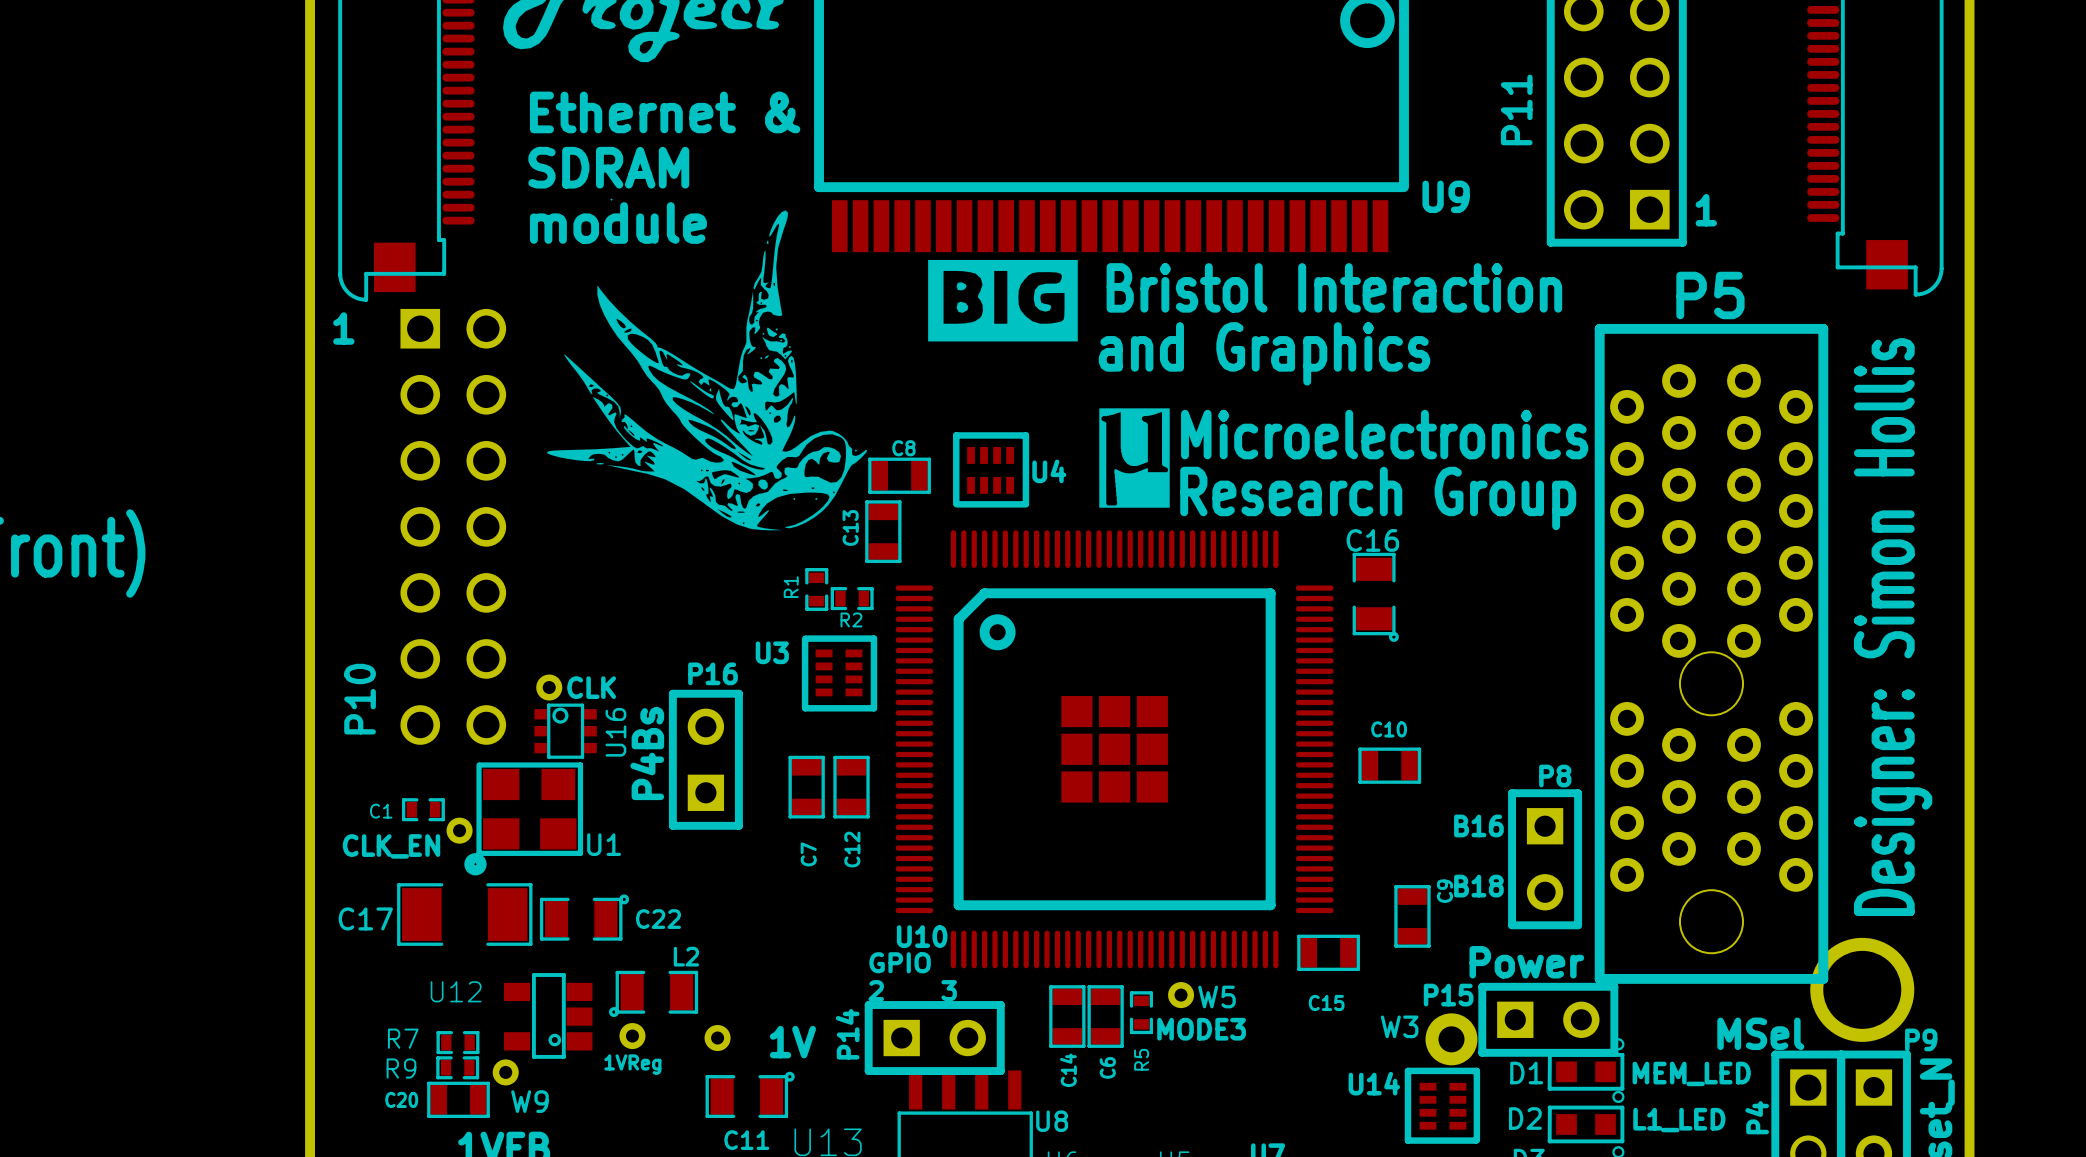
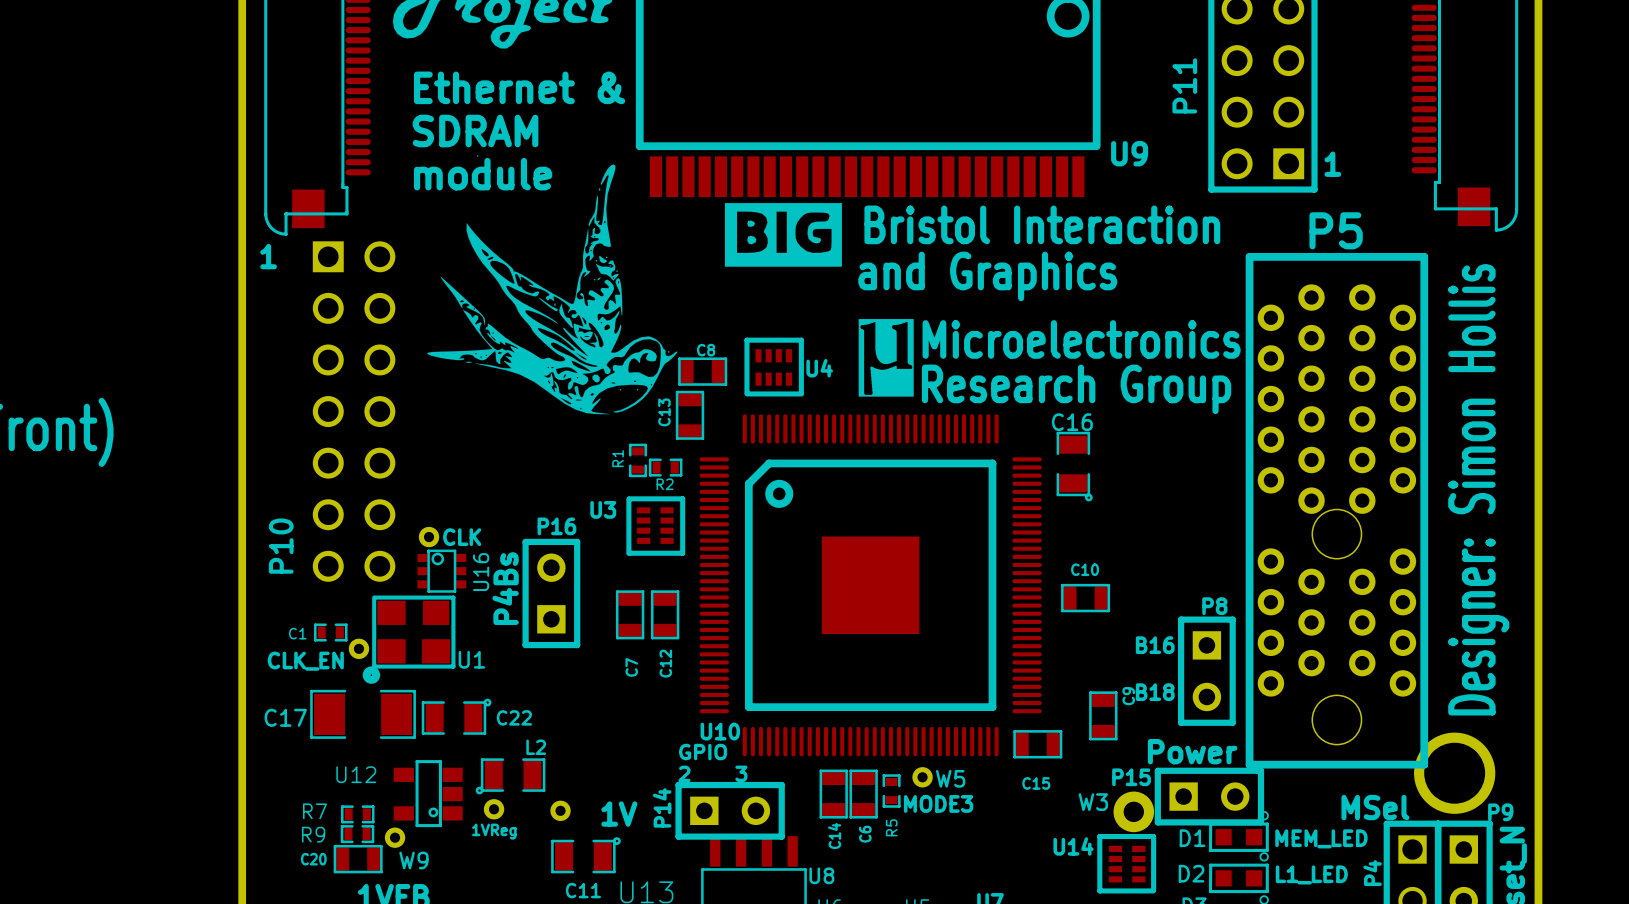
U10 footprint: [895, 530, 1334, 969] -> [699, 414, 1042, 757]

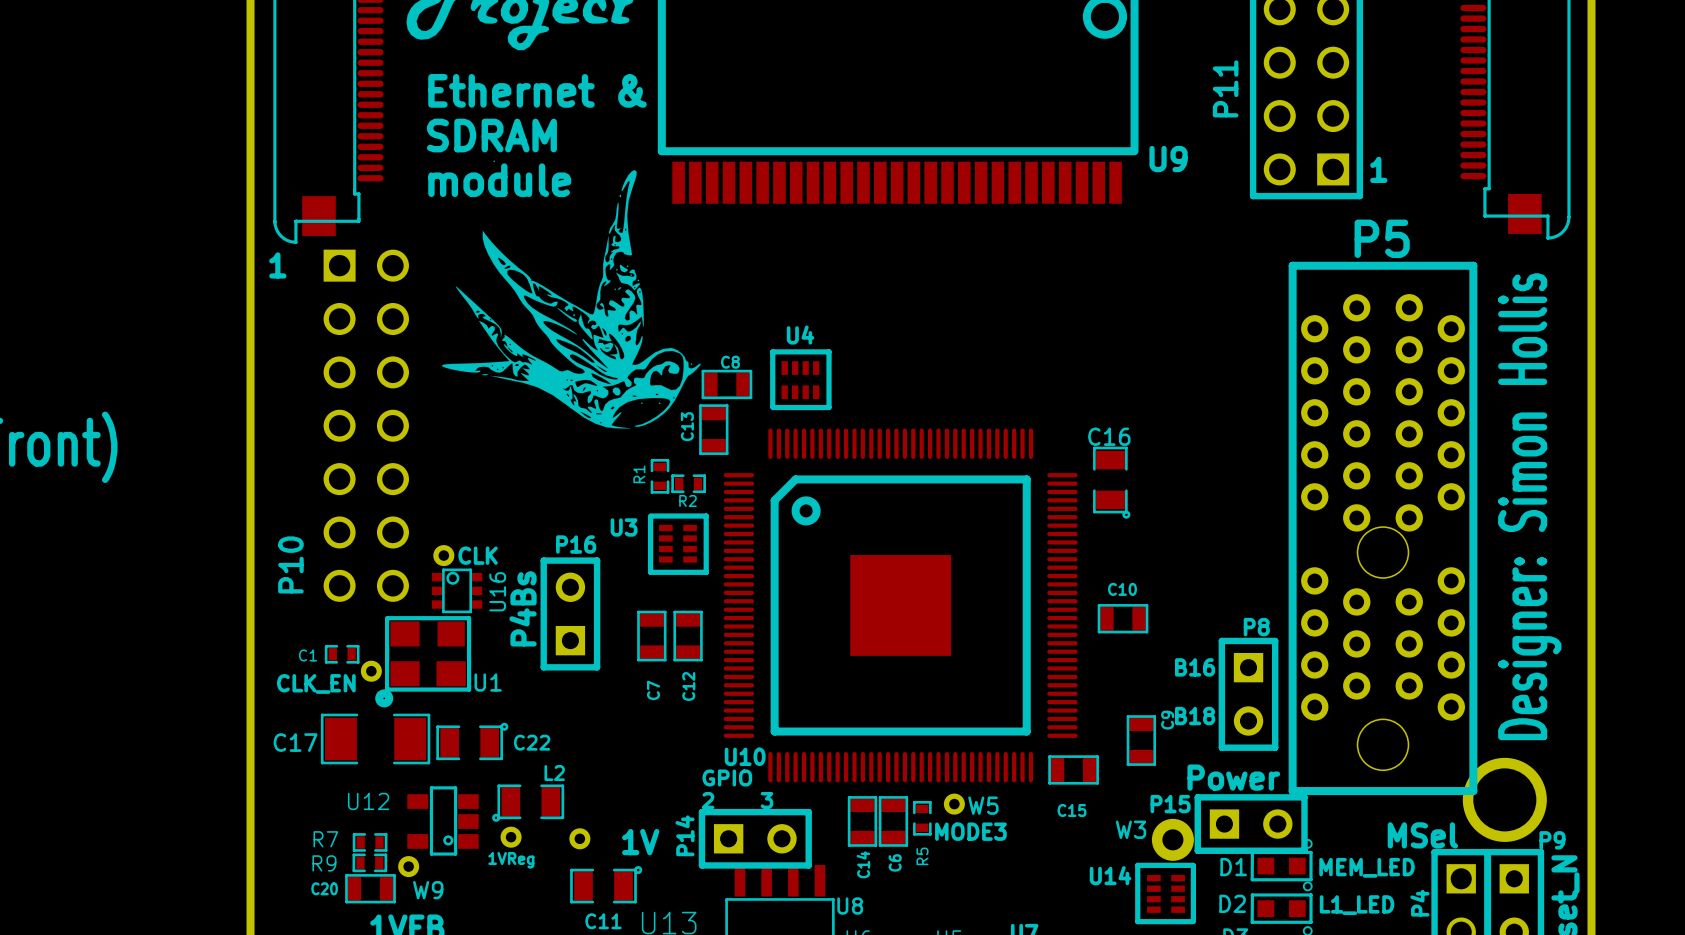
drawing: [724, 203, 842, 267] -> none
text: Bristol Interaction (1042, 224) -> none
text: and Graphics (987, 276) -> none
drawing: [858, 319, 914, 397] -> none
text: Microelectronics (1081, 339) -> none
U4 name position: U4 (819, 368) -> U4 (800, 335)
text: Research Group (1076, 389) -> none

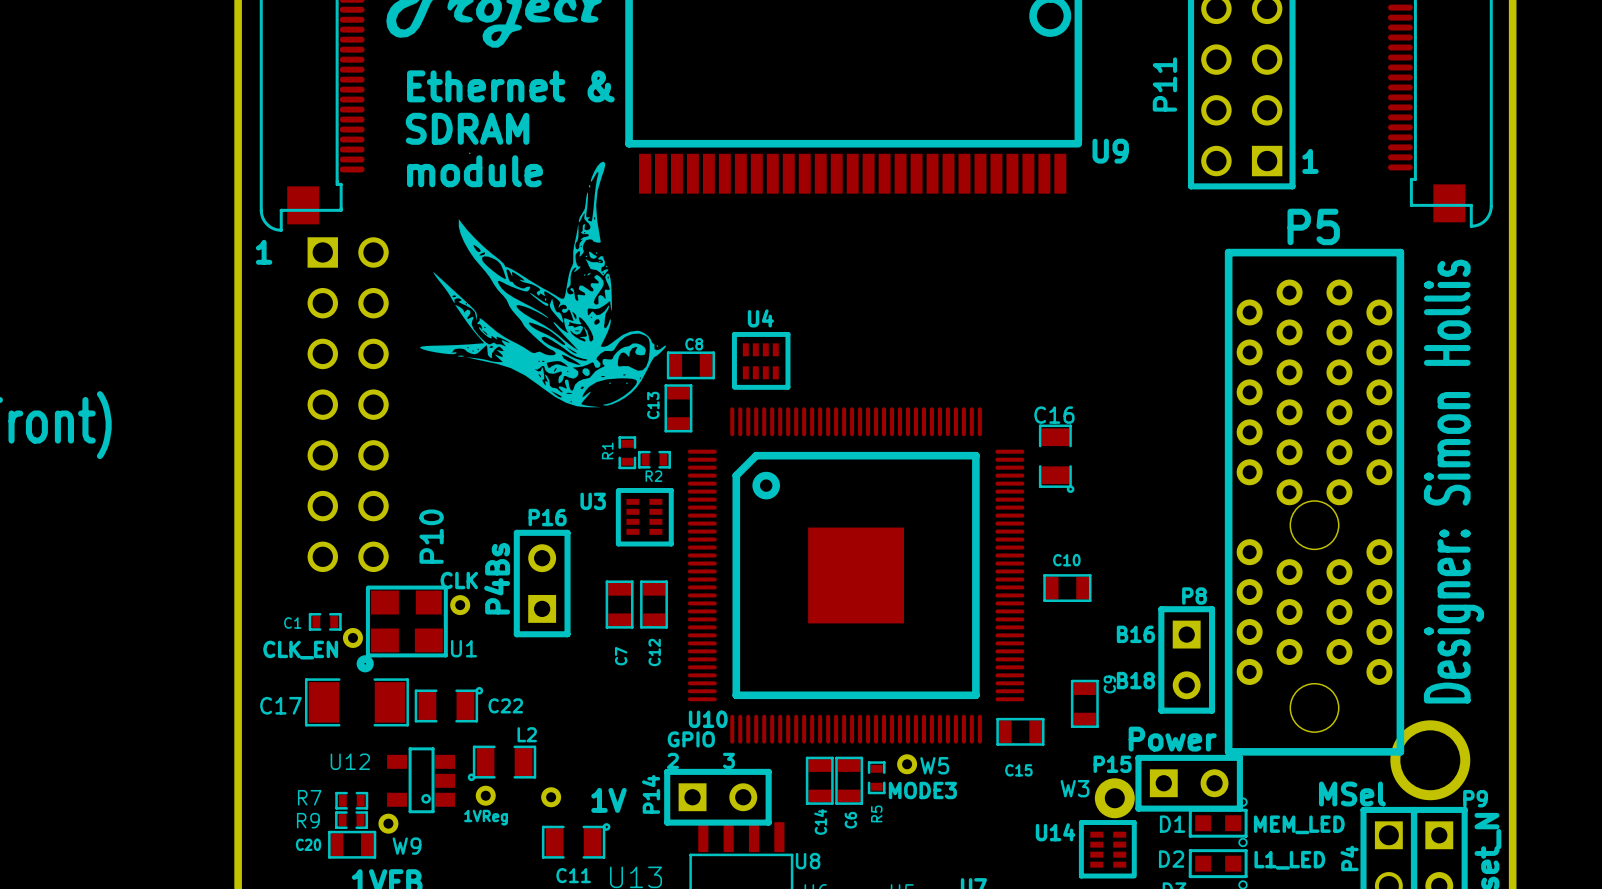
part position: (443, 555) -> (460, 605)
part value position: CLK (478, 555) -> CLK (459, 580)
P10 name position: P10 (290, 564) -> P10 (431, 536)
U16: (457, 590) -> none

